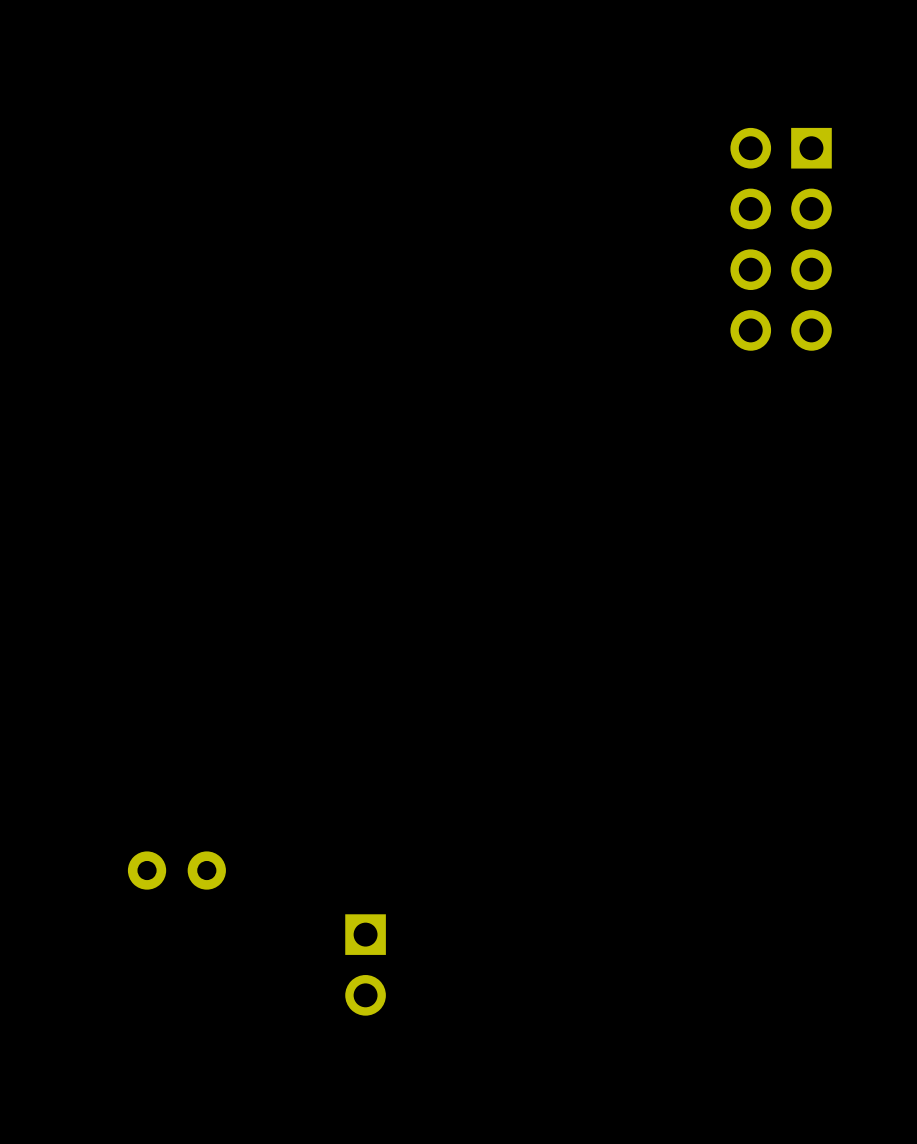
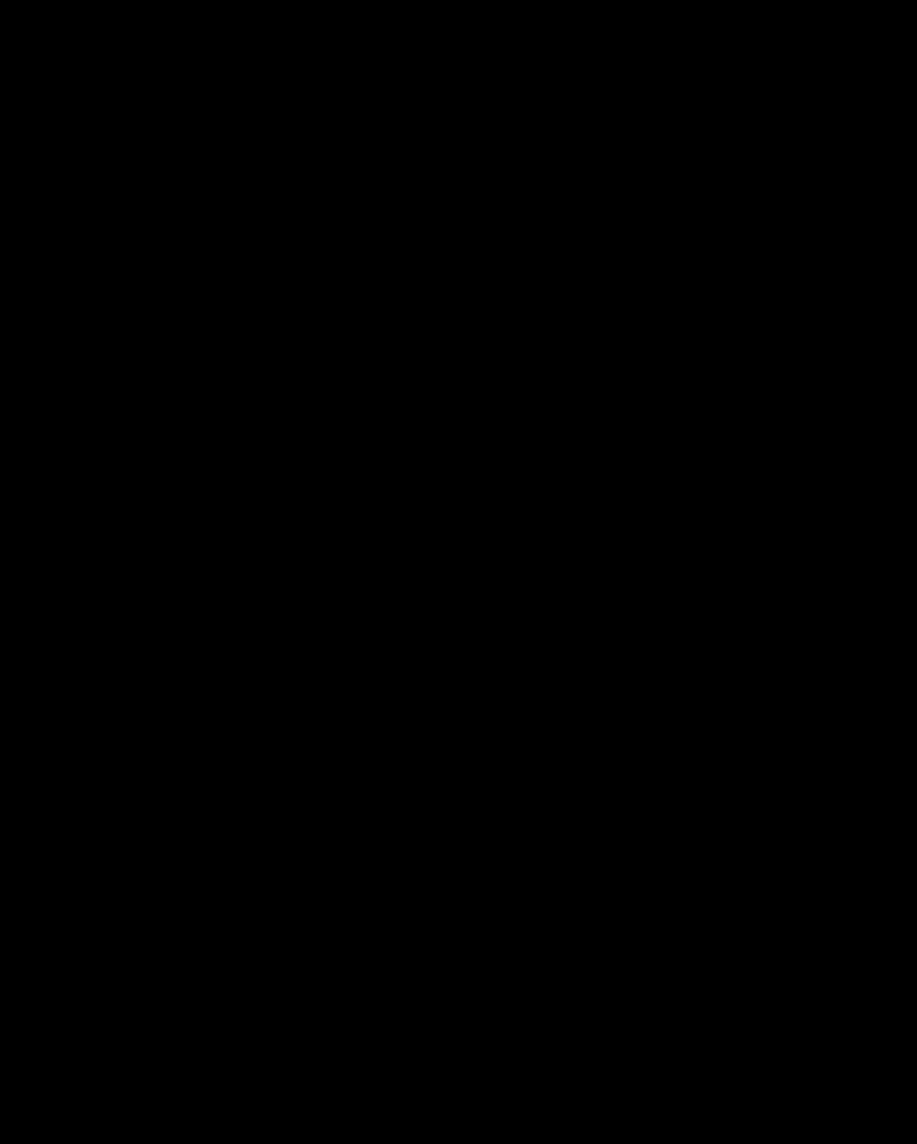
part: (781, 239) -> none
part: (176, 870) -> none
part: (365, 964) -> none

